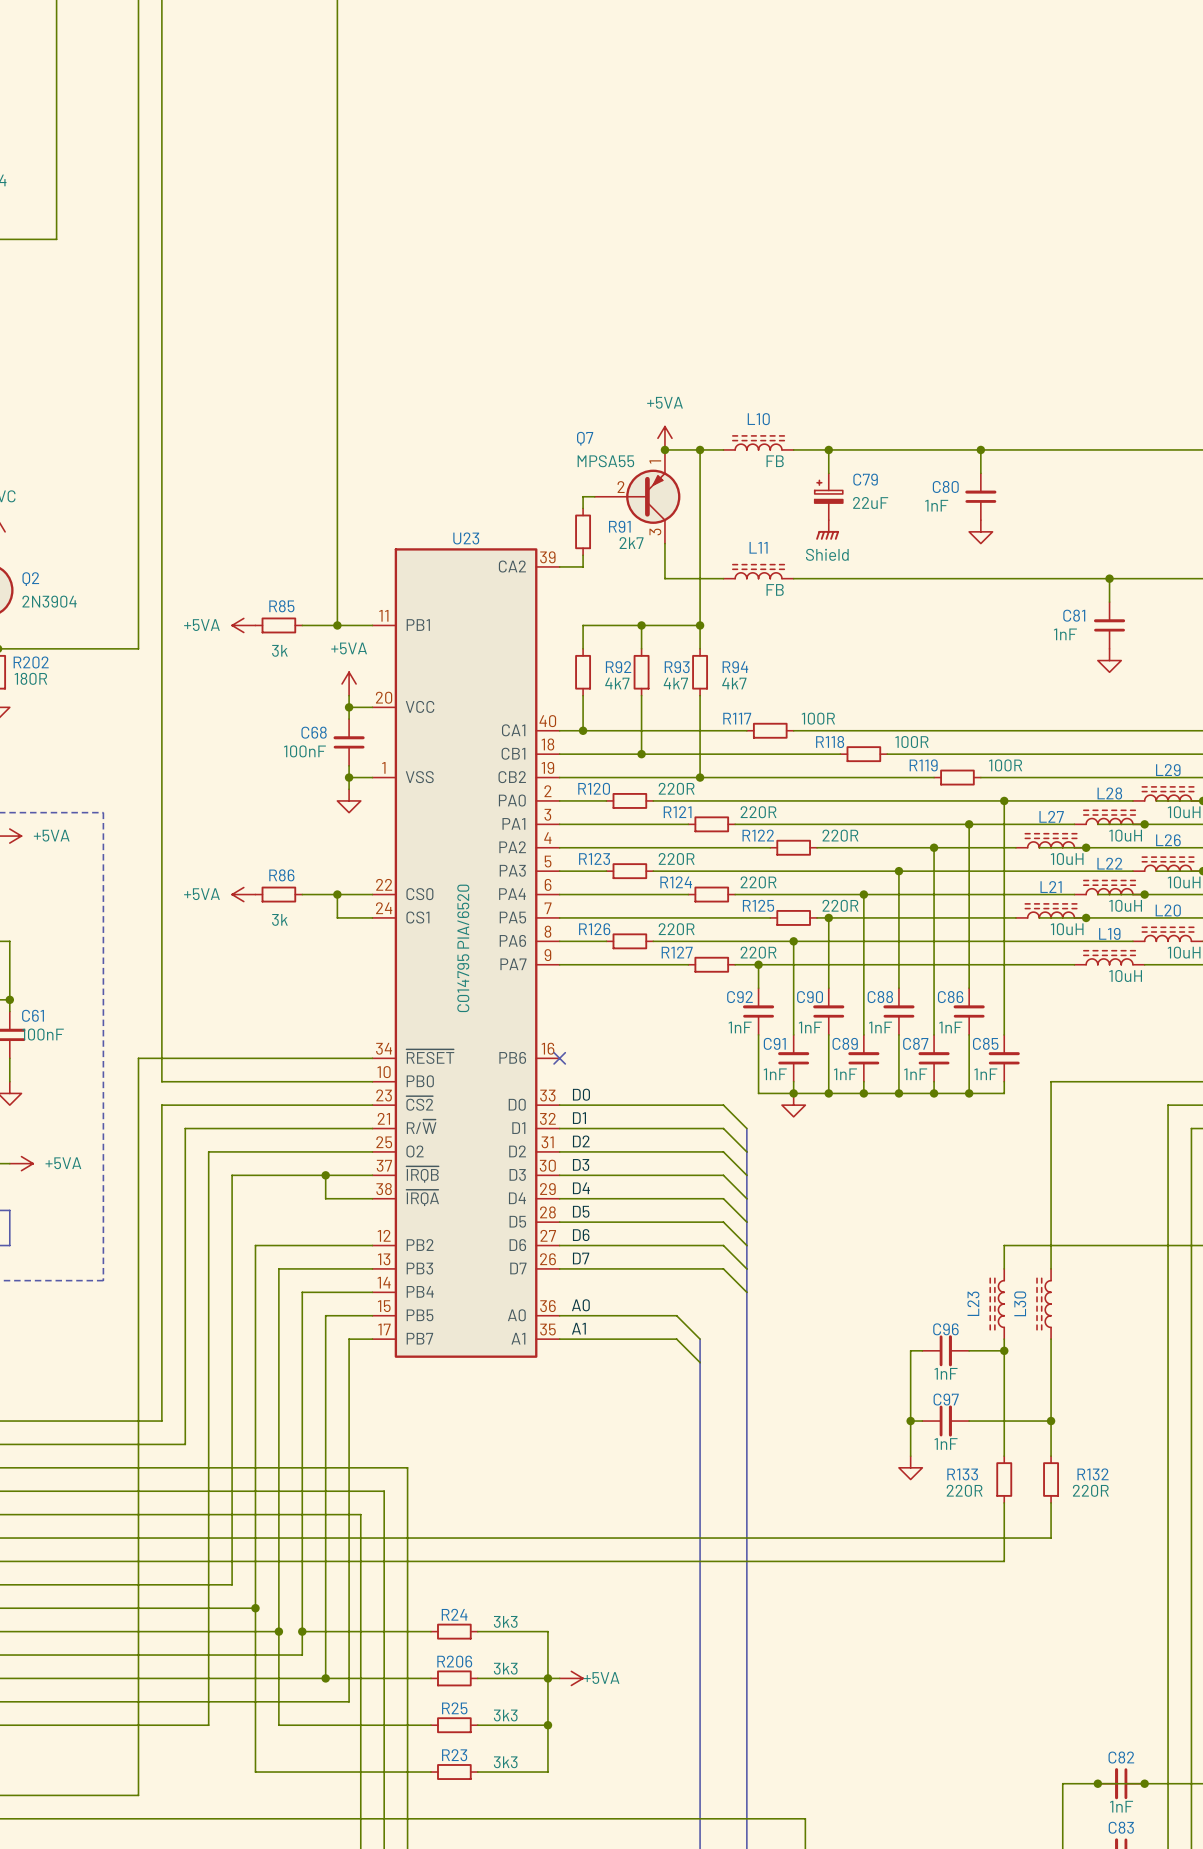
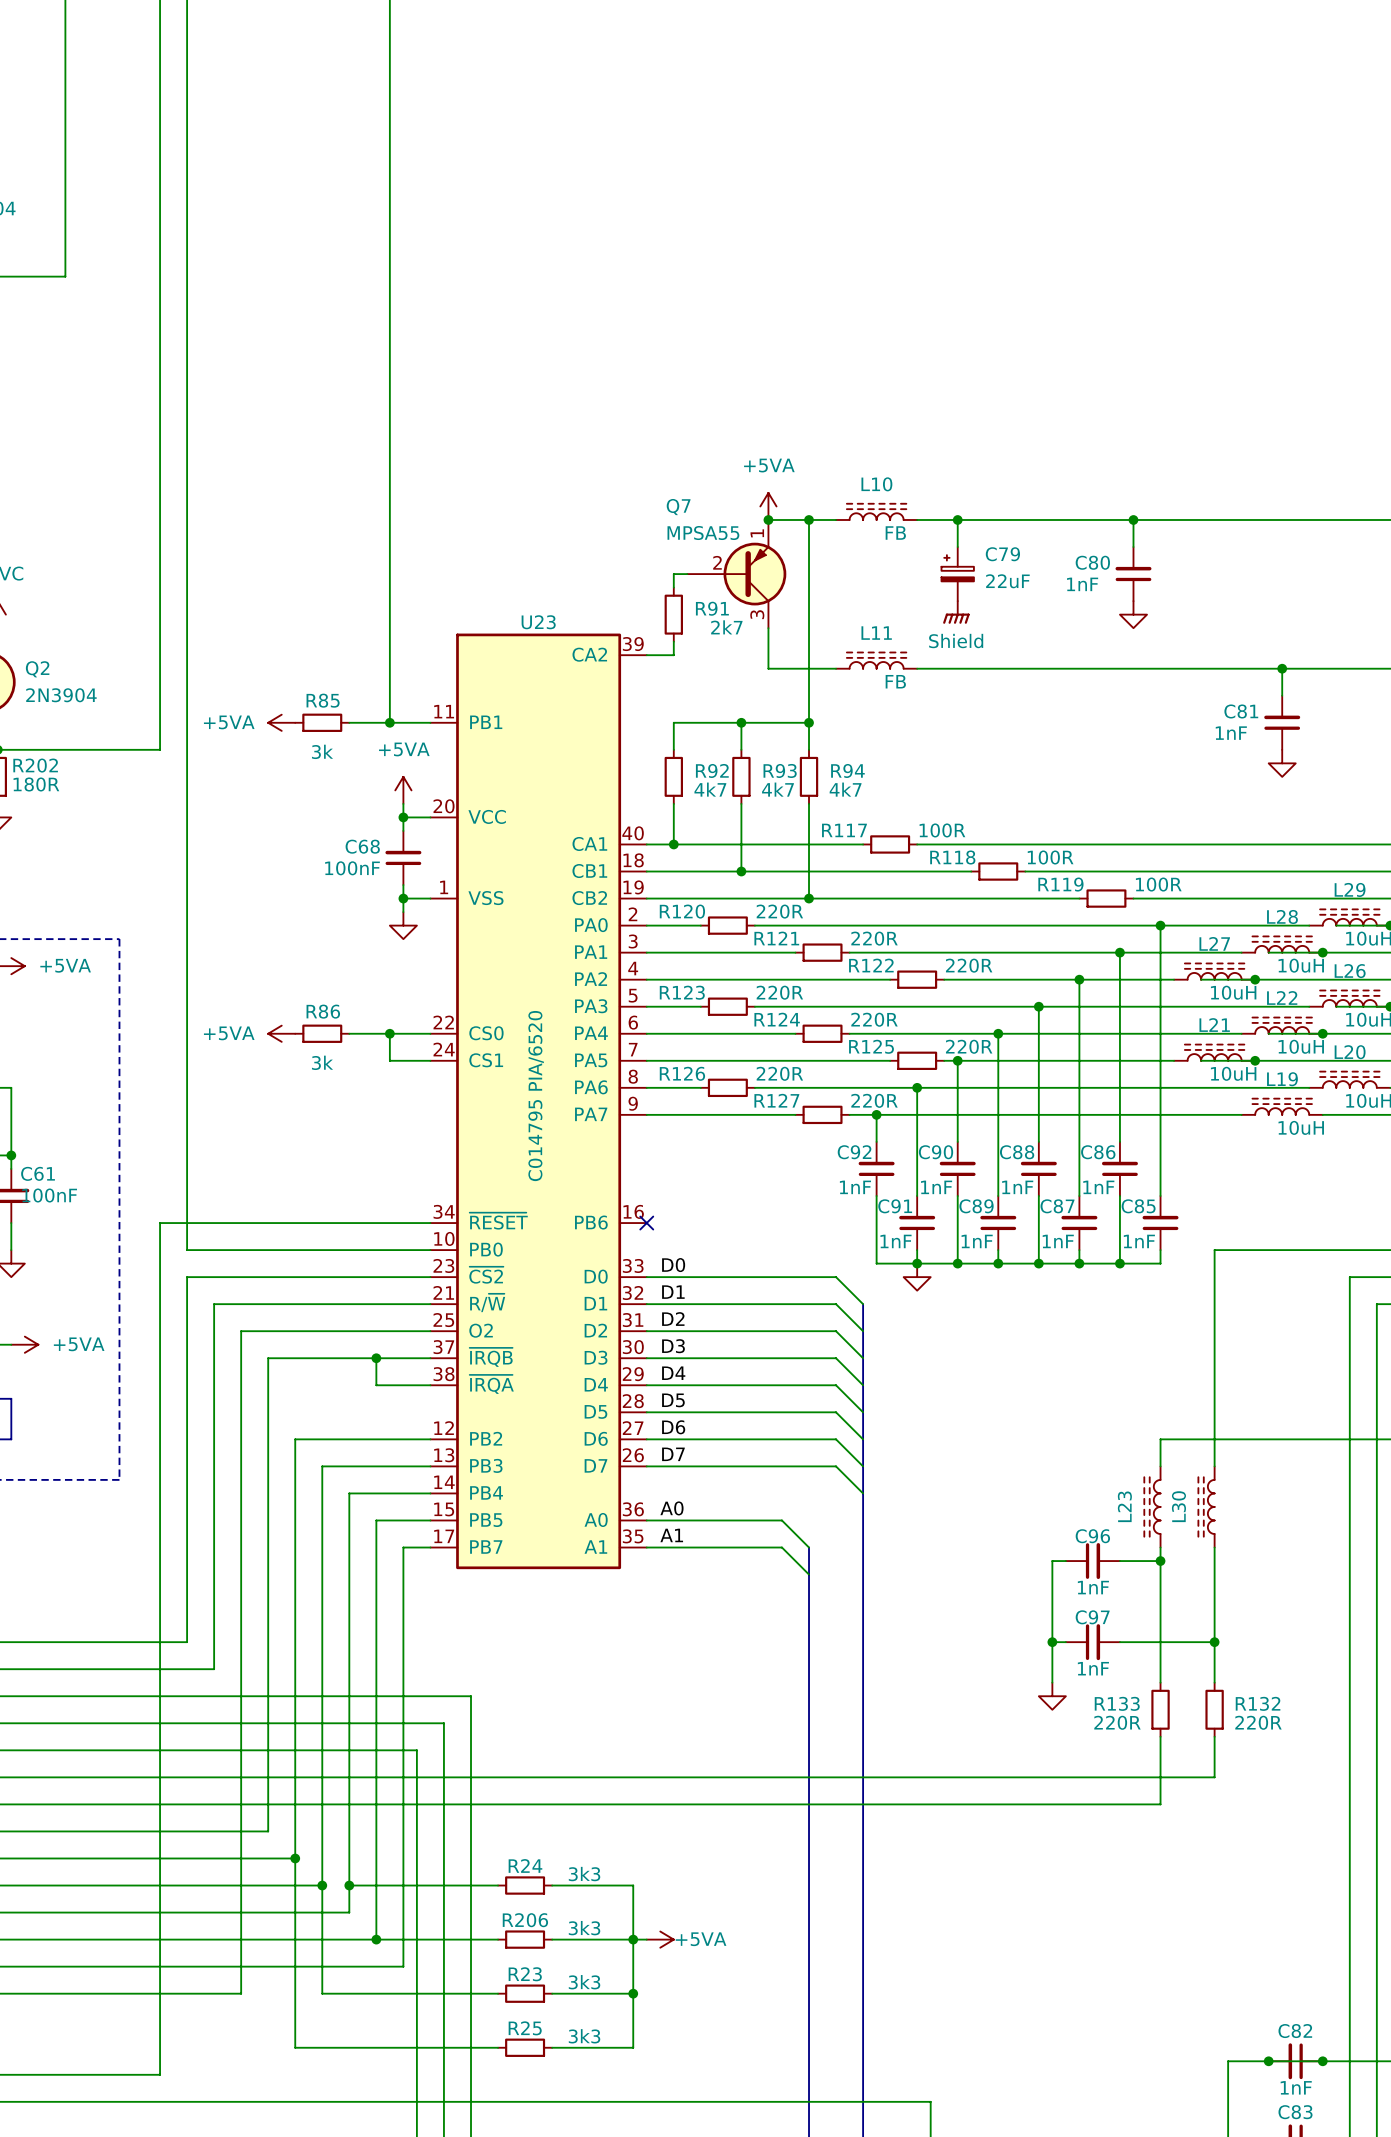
R25 name: R25 (454, 1708) -> R23 (525, 1974)
R23 name: R23 (454, 1755) -> R25 (525, 2028)

